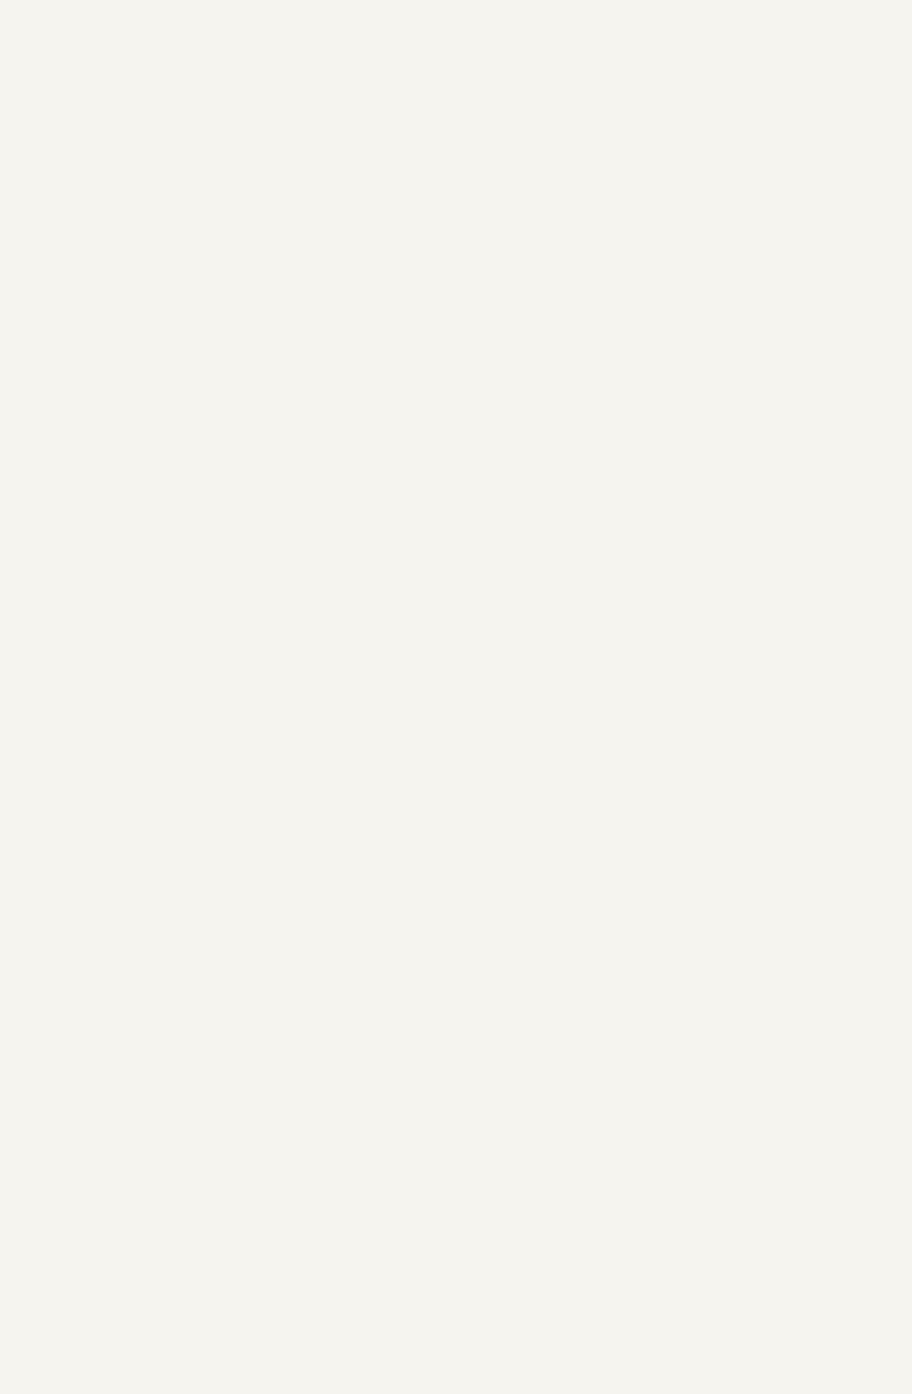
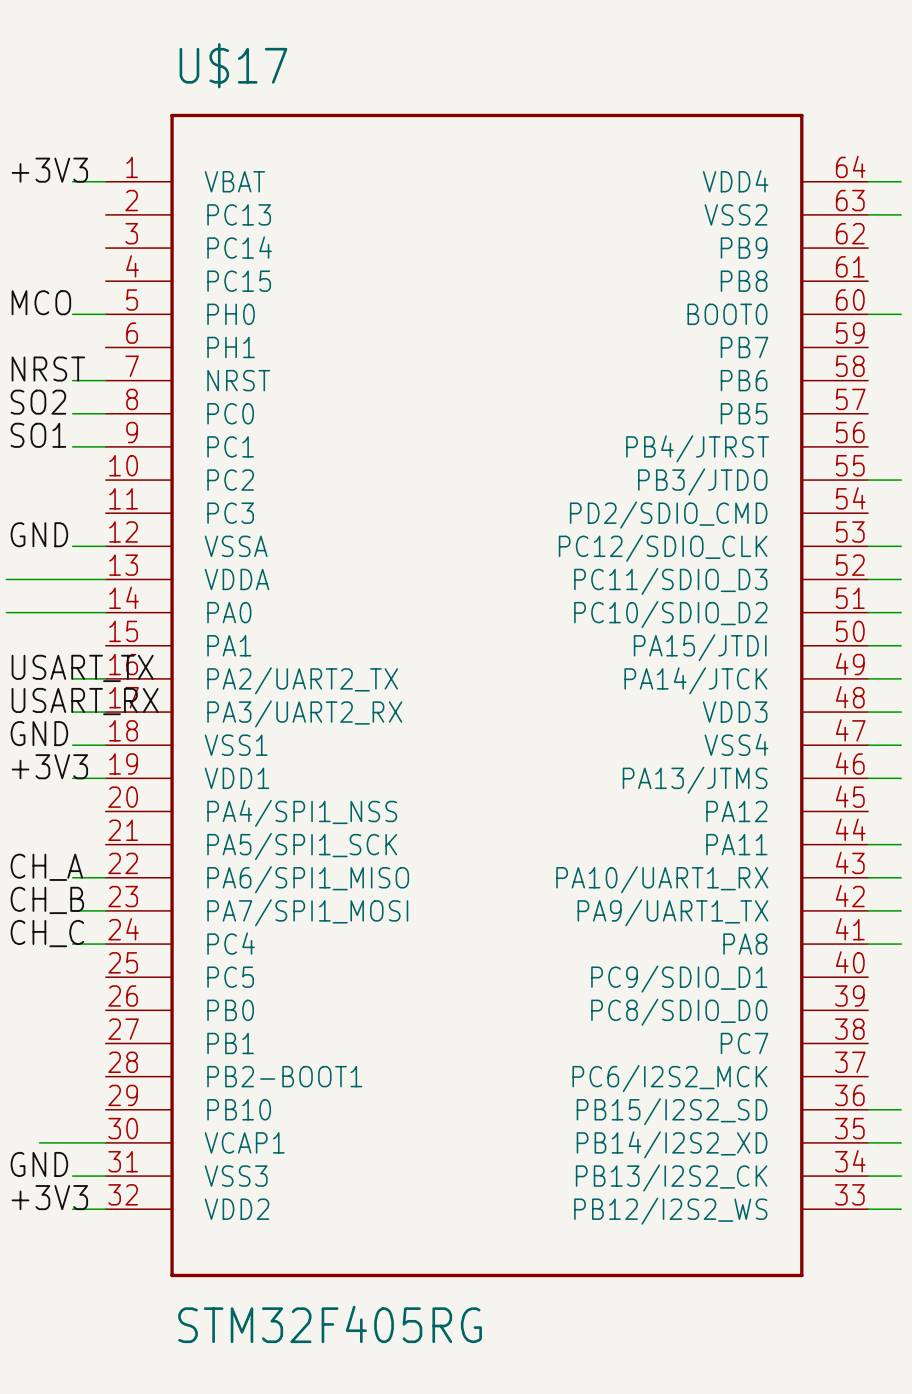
label: none -> +3V3 (49, 170)
wire: none -> (72, 181) (105, 181)
wire: none -> (868, 181) (901, 181)
wire: none -> (868, 214) (901, 214)
label: none -> MCO (41, 302)
wire: none -> (72, 314) (105, 314)
wire: none -> (868, 314) (901, 314)
label: none -> NRST (48, 369)
wire: none -> (72, 380) (105, 380)
label: none -> SO2 (38, 402)
wire: none -> (72, 413) (105, 413)
label: none -> SO1 (38, 435)
wire: none -> (72, 446) (105, 446)
wire: none -> (868, 480) (901, 480)
label: none -> GND (39, 534)
wire: none -> (72, 546) (105, 546)
wire: none -> (868, 546) (901, 546)
wire: none -> (6, 579) (105, 579)
wire: none -> (868, 579) (901, 579)
wire: none -> (6, 612) (105, 612)
wire: none -> (868, 612) (901, 612)
wire: none -> (868, 645) (901, 645)
label: none -> USART_TX (82, 668)
wire: none -> (72, 678) (105, 678)
wire: none -> (868, 678) (901, 678)
U$17: none -> STM32F405RG (486, 695)
label: none -> USART_RX (85, 701)
wire: none -> (72, 712) (105, 712)
wire: none -> (868, 712) (901, 712)
label: none -> GND (39, 733)
wire: none -> (72, 745) (105, 745)
wire: none -> (868, 745) (901, 745)
label: none -> +3V3 (49, 766)
wire: none -> (72, 778) (105, 778)
wire: none -> (868, 778) (901, 778)
wire: none -> (868, 844) (901, 844)
label: none -> CH_A (46, 867)
wire: none -> (72, 877) (105, 877)
wire: none -> (868, 877) (901, 877)
label: none -> CH_B (47, 900)
wire: none -> (72, 910) (105, 910)
wire: none -> (868, 910) (901, 910)
label: none -> CH_C (47, 933)
wire: none -> (72, 944) (105, 944)
wire: none -> (868, 944) (901, 944)
wire: none -> (868, 1109) (901, 1109)
wire: none -> (39, 1142) (105, 1142)
wire: none -> (868, 1142) (901, 1142)
label: none -> GND (39, 1164)
wire: none -> (72, 1176) (105, 1176)
wire: none -> (868, 1176) (901, 1176)
label: none -> +3V3 (49, 1197)
wire: none -> (72, 1209) (105, 1209)
wire: none -> (868, 1209) (901, 1209)

